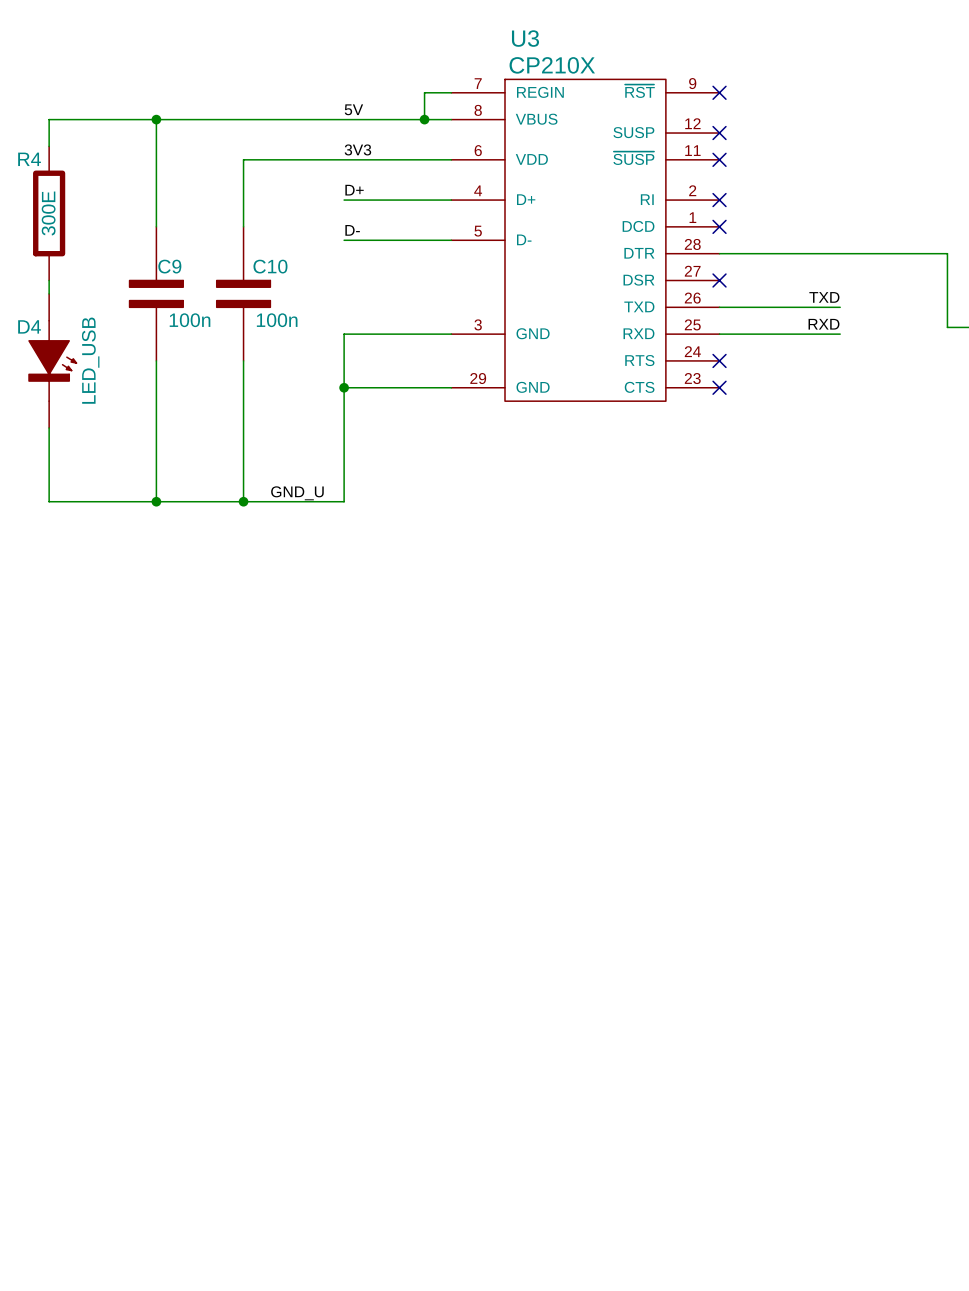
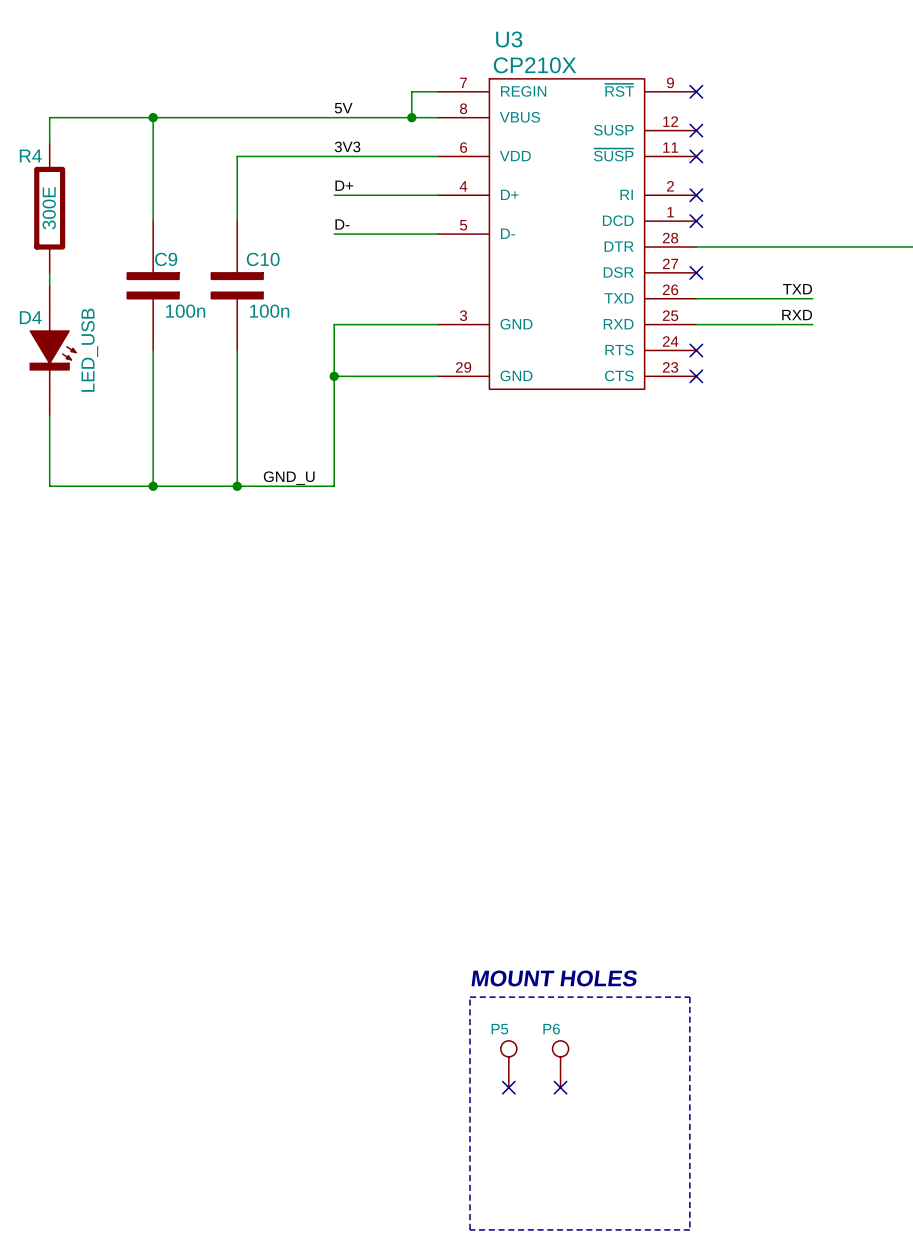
text: none -> MOUNT HOLES (554, 978)
line: none -> (470, 997) (470, 1229) (689, 1229) (689, 997) (470, 997)
P5: none -> (508, 1064)
P6: none -> (560, 1064)
no-connect mark: none -> (508, 1087)
no-connect mark: none -> (560, 1087)

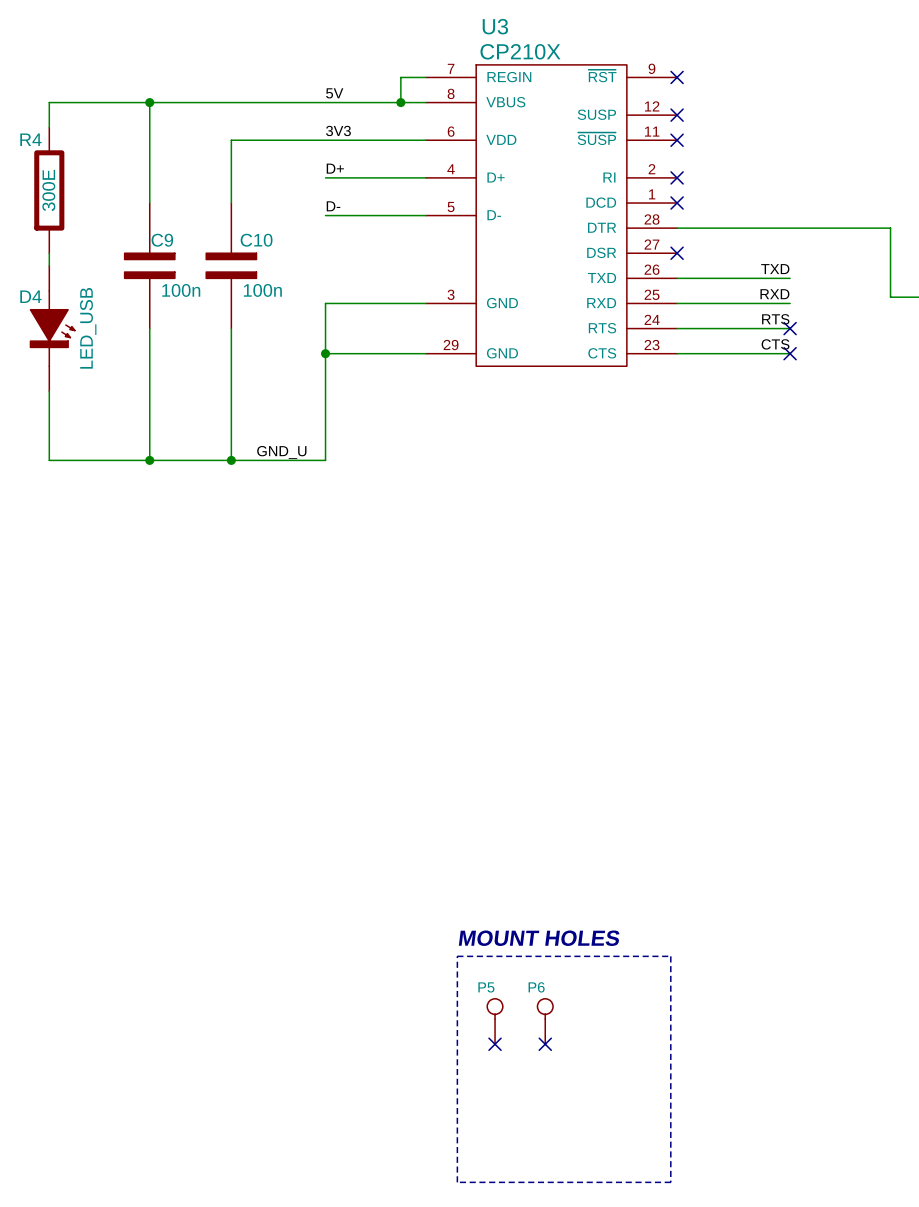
label: none -> RTS (775, 319)
wire: none -> (677, 328) (790, 328)
no-connect mark: (696, 350) -> none
no-connect mark: none -> (790, 328)
label: none -> CTS (775, 344)
wire: none -> (677, 353) (790, 353)
no-connect mark: (696, 376) -> none
no-connect mark: none -> (790, 353)

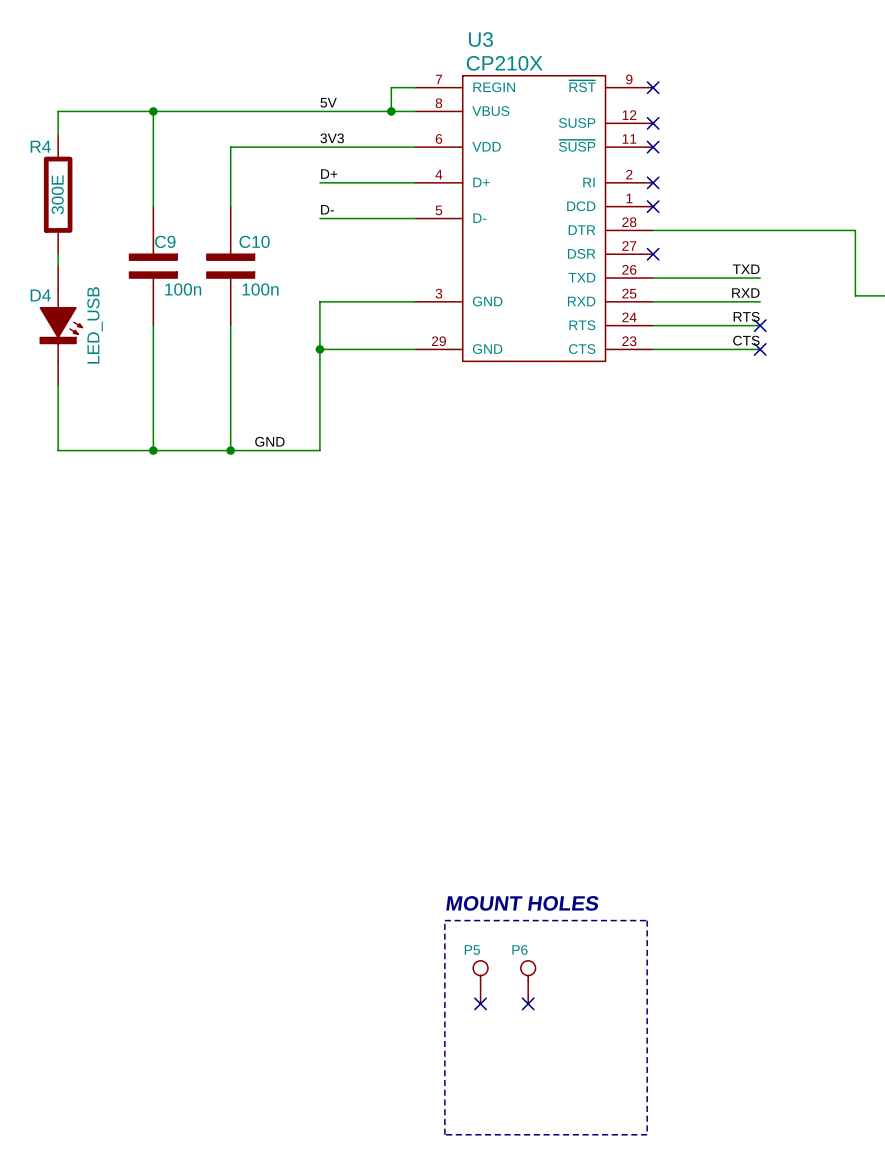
label: GND_U (281, 452) -> GND (269, 441)

